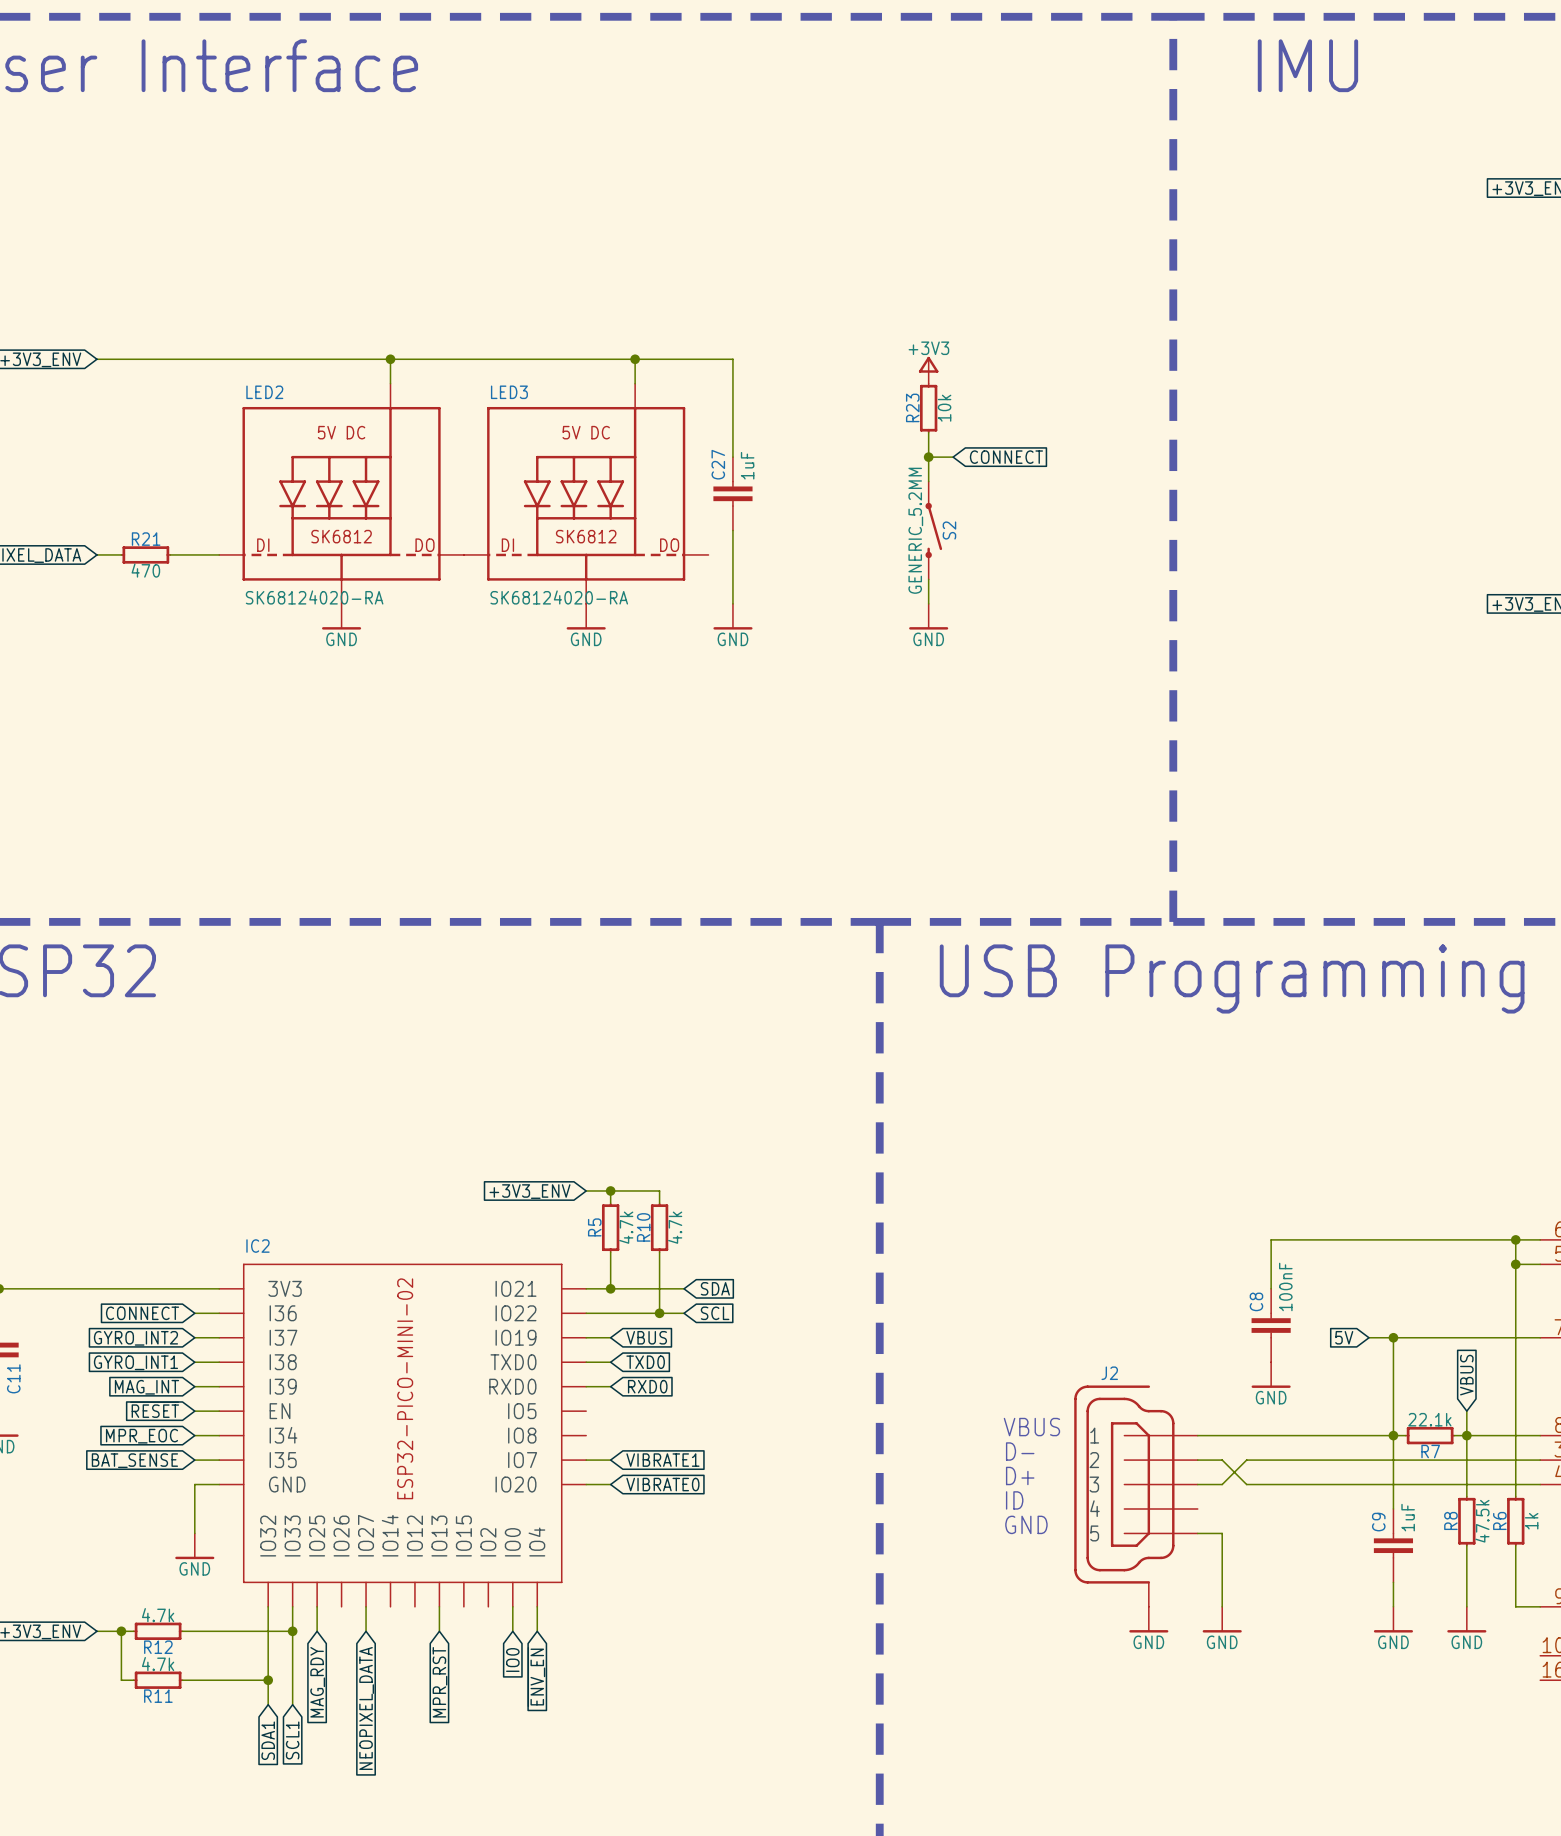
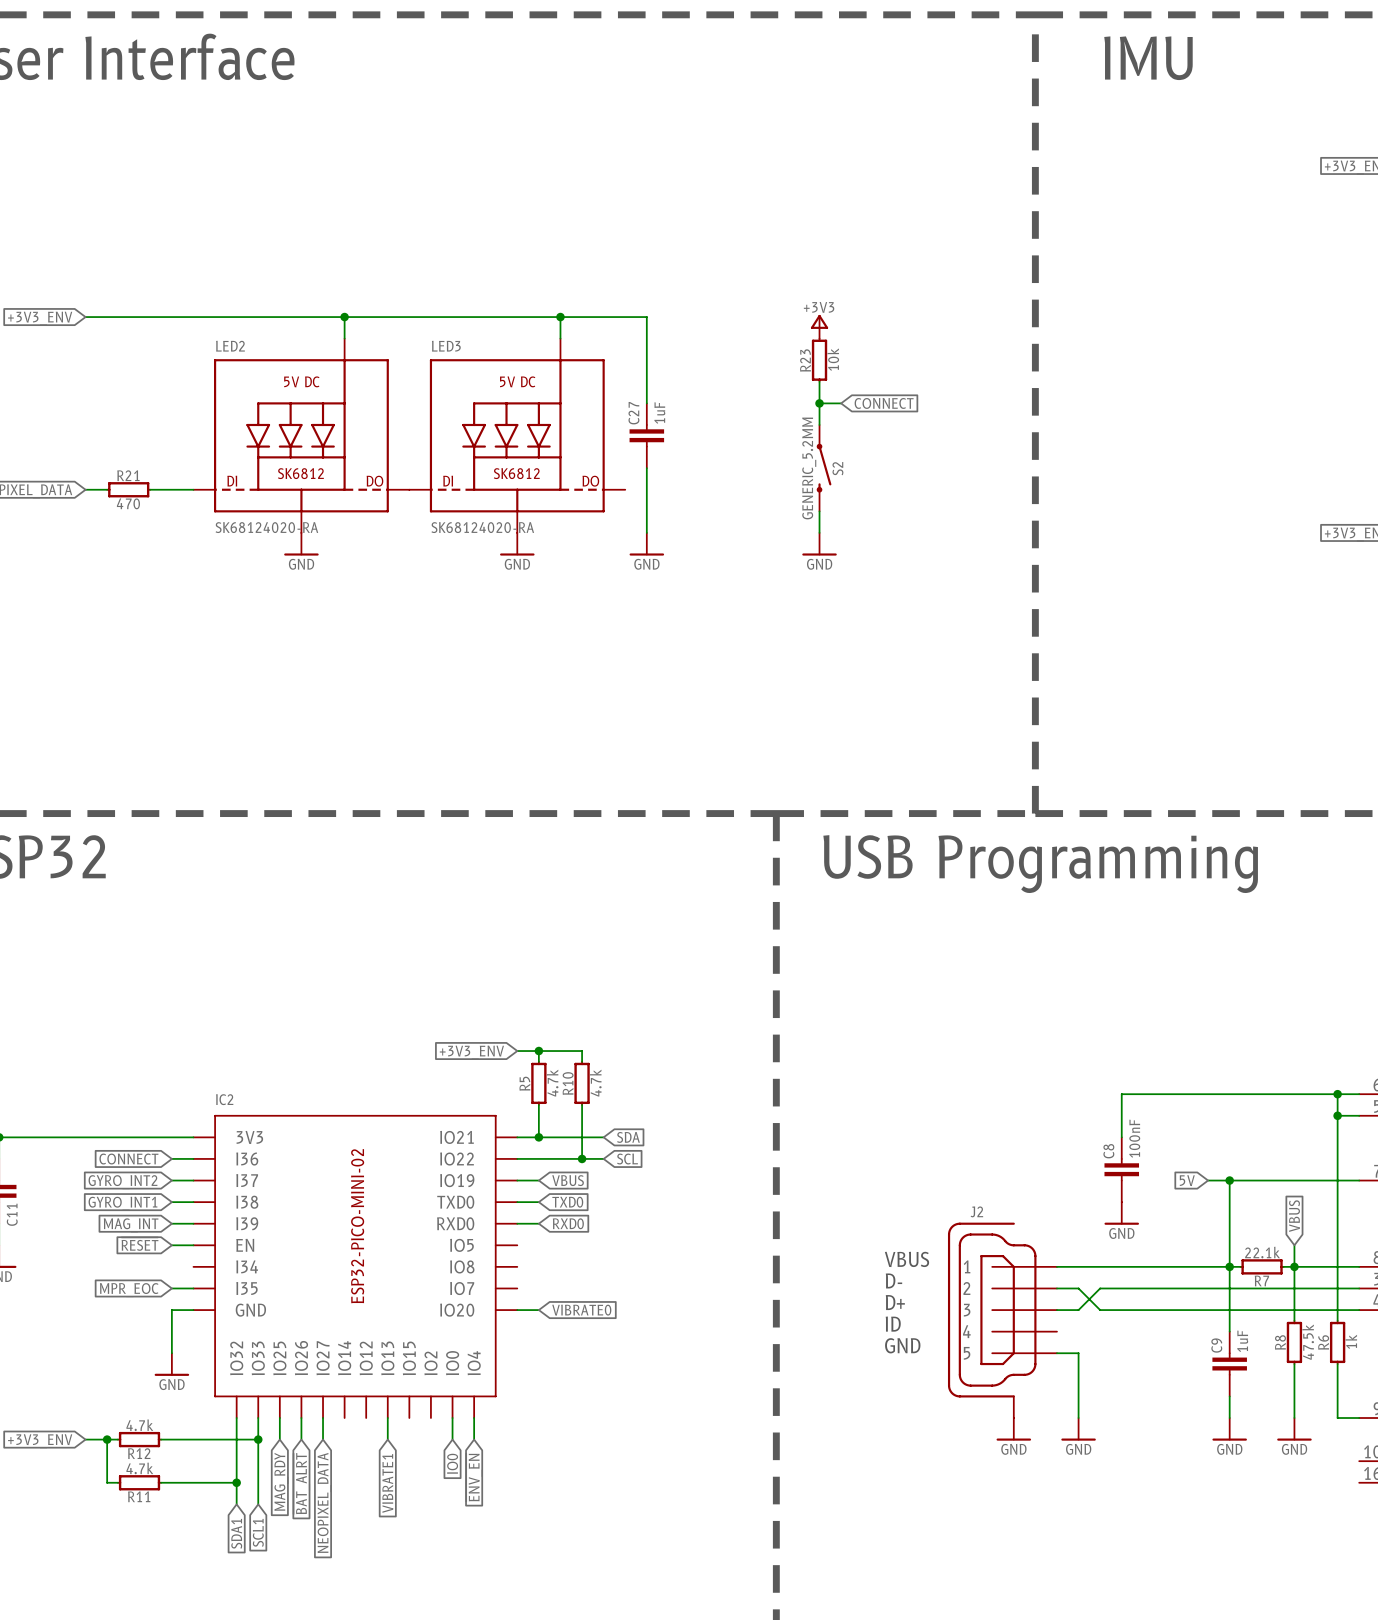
wire: (194, 1435) (219, 1435) -> none
global label: MPR_EOC (141, 1436) -> none
global label: BAT_SENSE (134, 1460) -> MPR_EOC (129, 1290)
wire: (586, 1460) (610, 1460) -> none
global label: VIBRATE1 (662, 1460) -> none
wire: none -> (301, 1418) (301, 1439)
global label: MPR_RST (440, 1682) -> VIBRATE1 (387, 1483)
global label: none -> ~{BAT_ALRT} (301, 1483)

